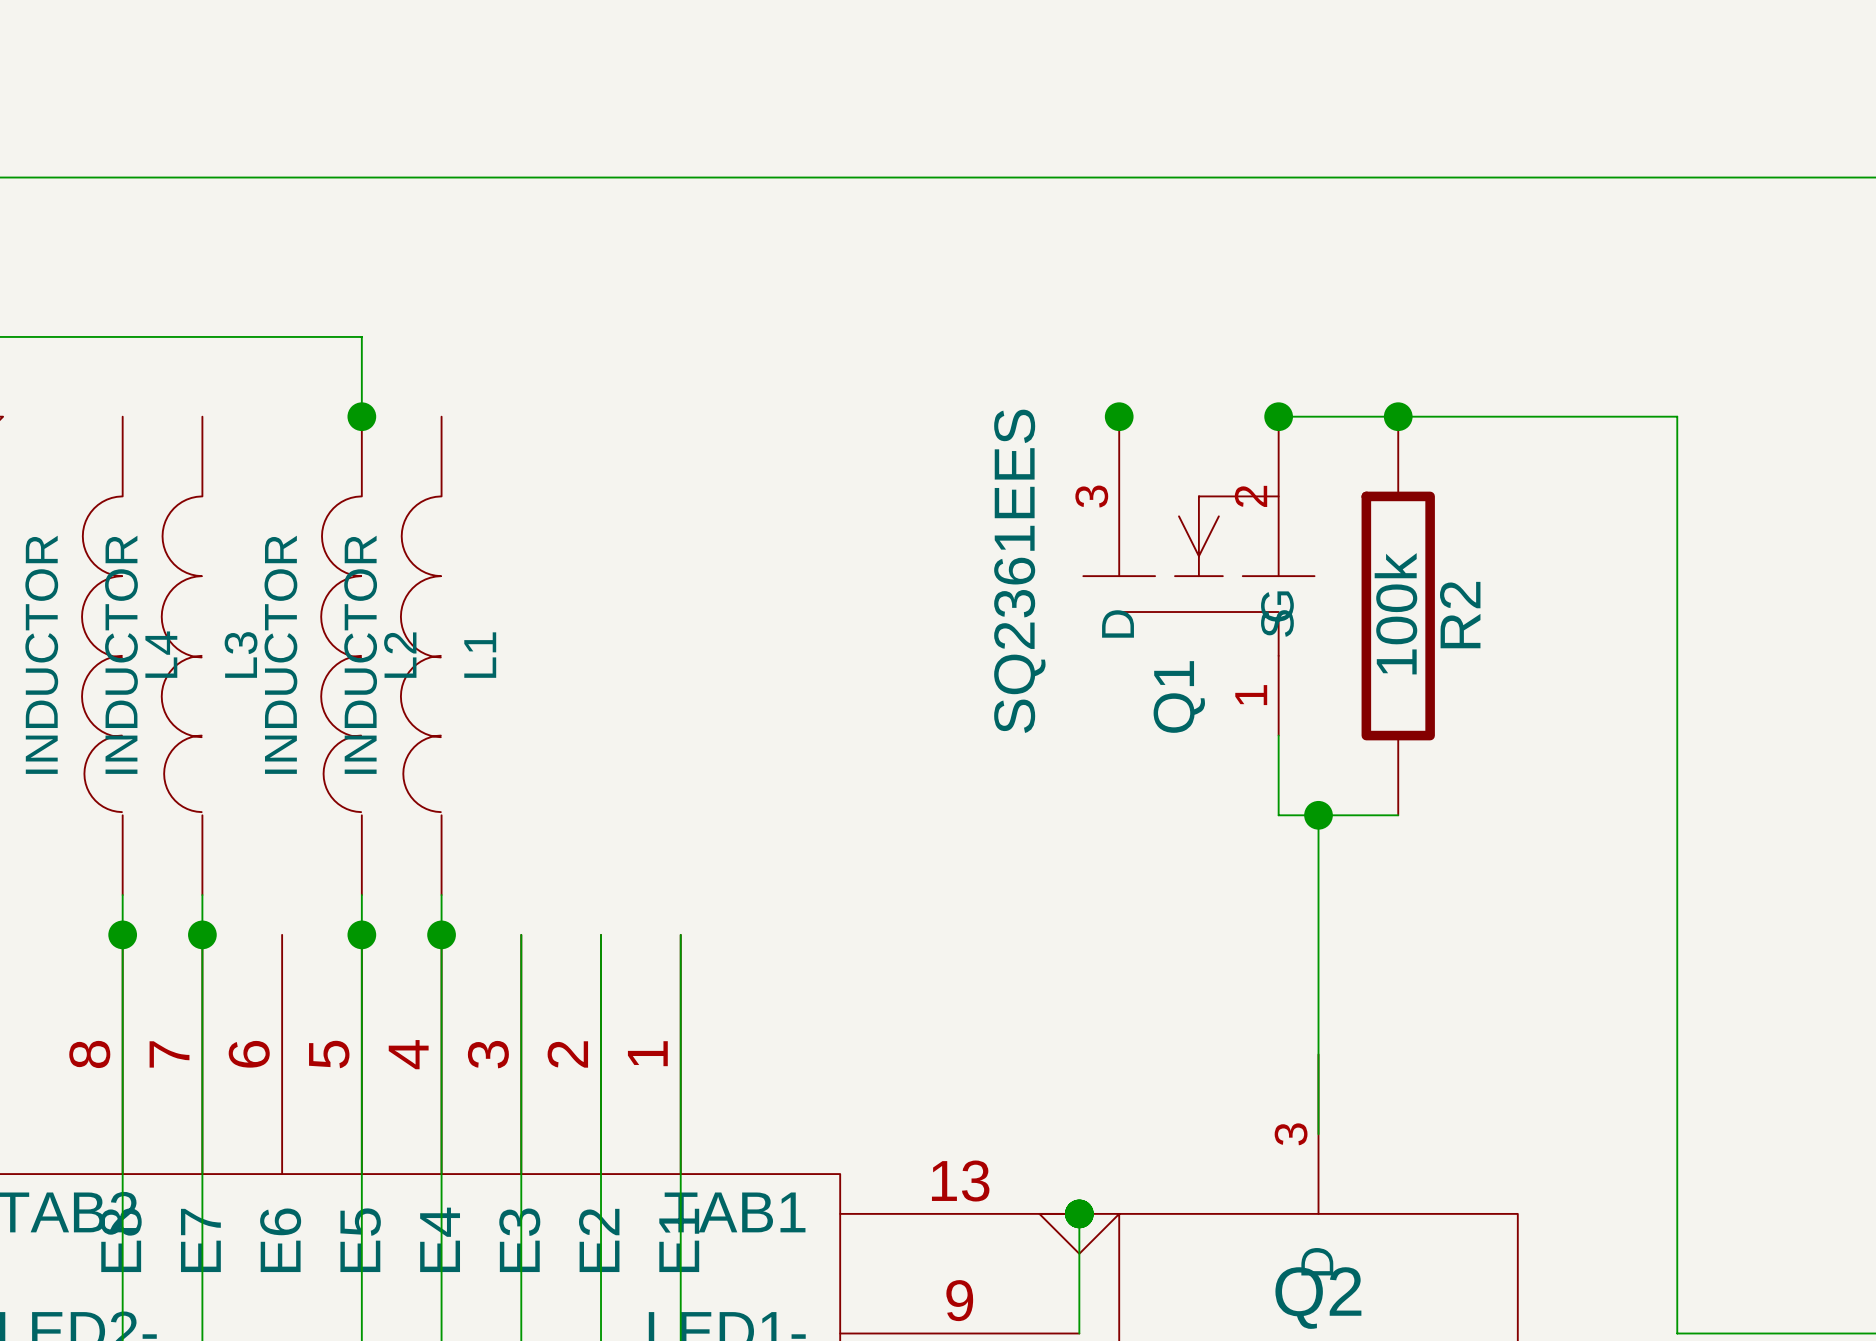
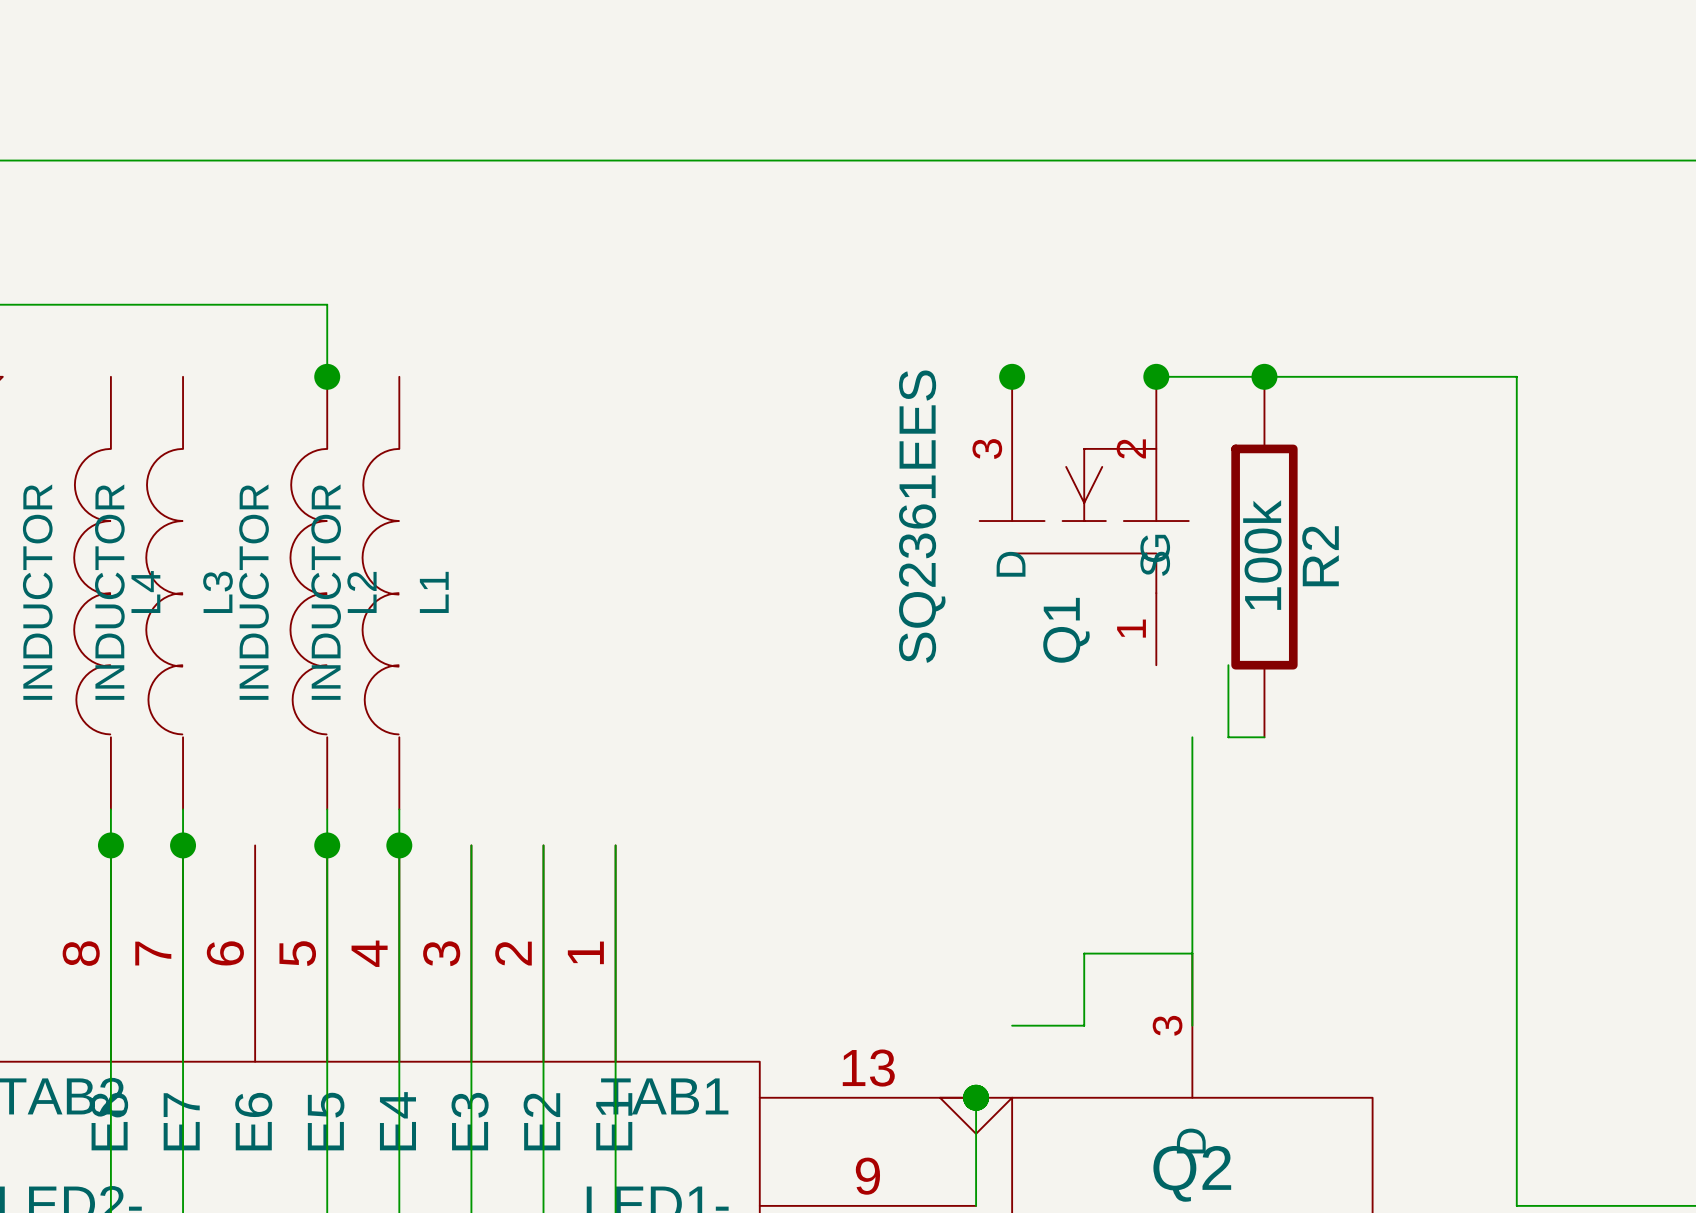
wire: (1278, 735) (1278, 815) (1358, 815) -> (1228, 665) (1228, 737)
junction: (1318, 815) -> none
wire: none -> (1192, 953) (1084, 953) (1084, 1025) (1012, 1025)

